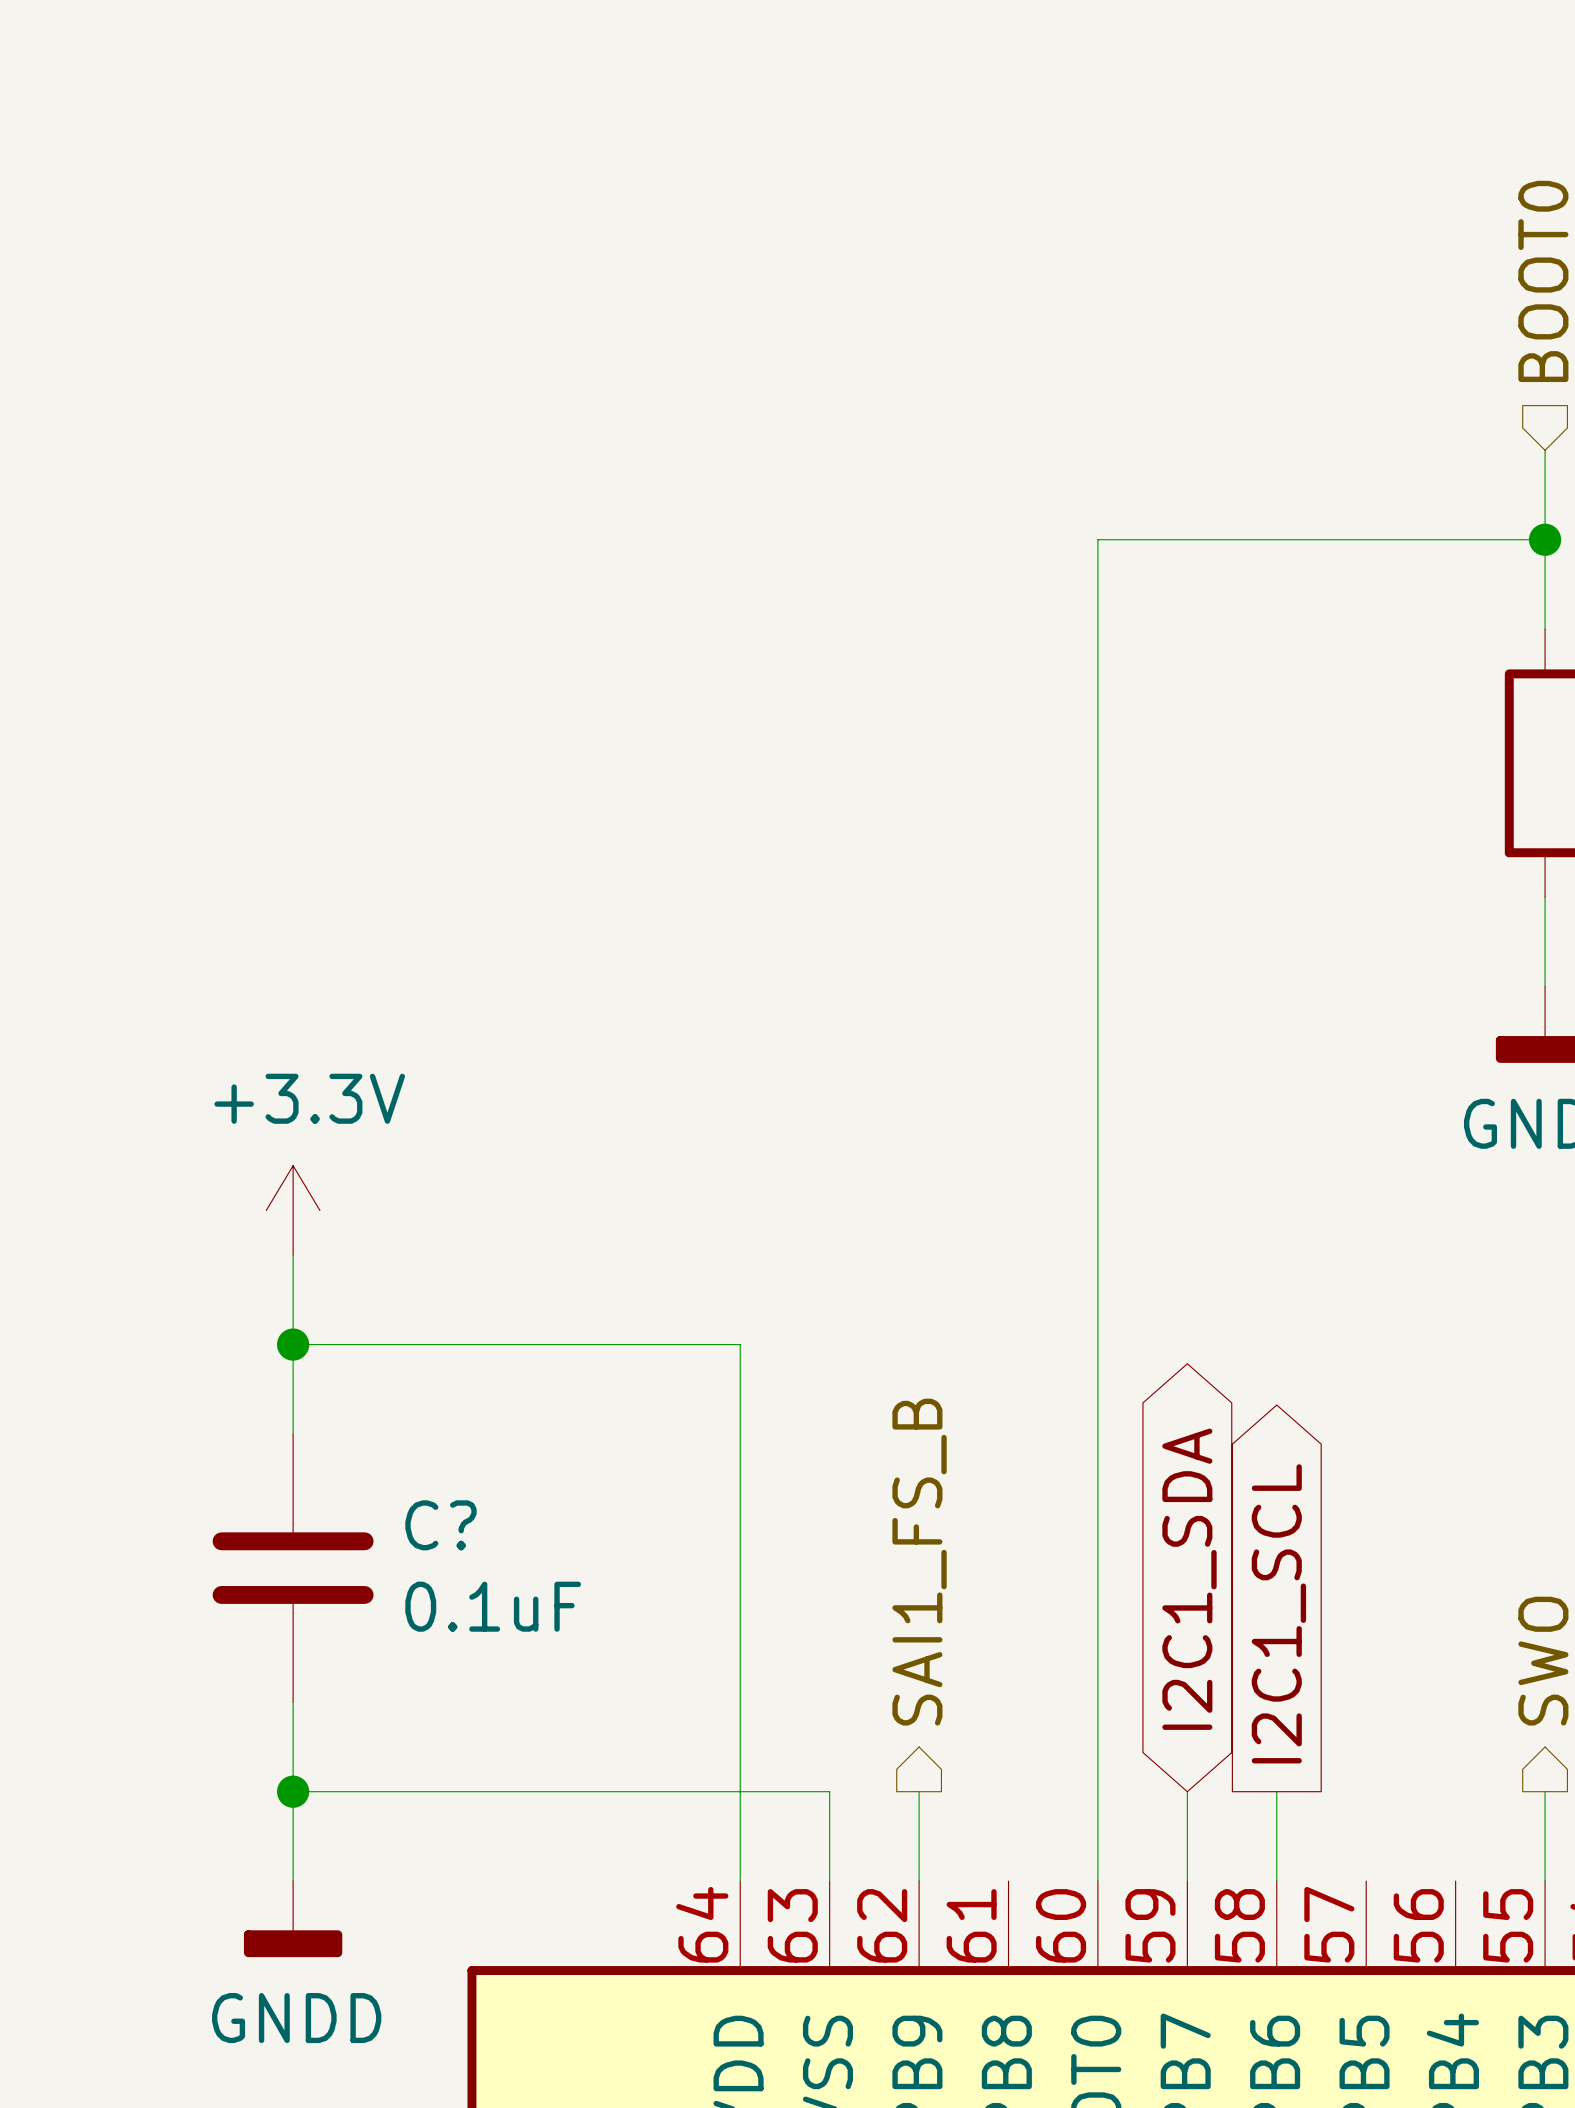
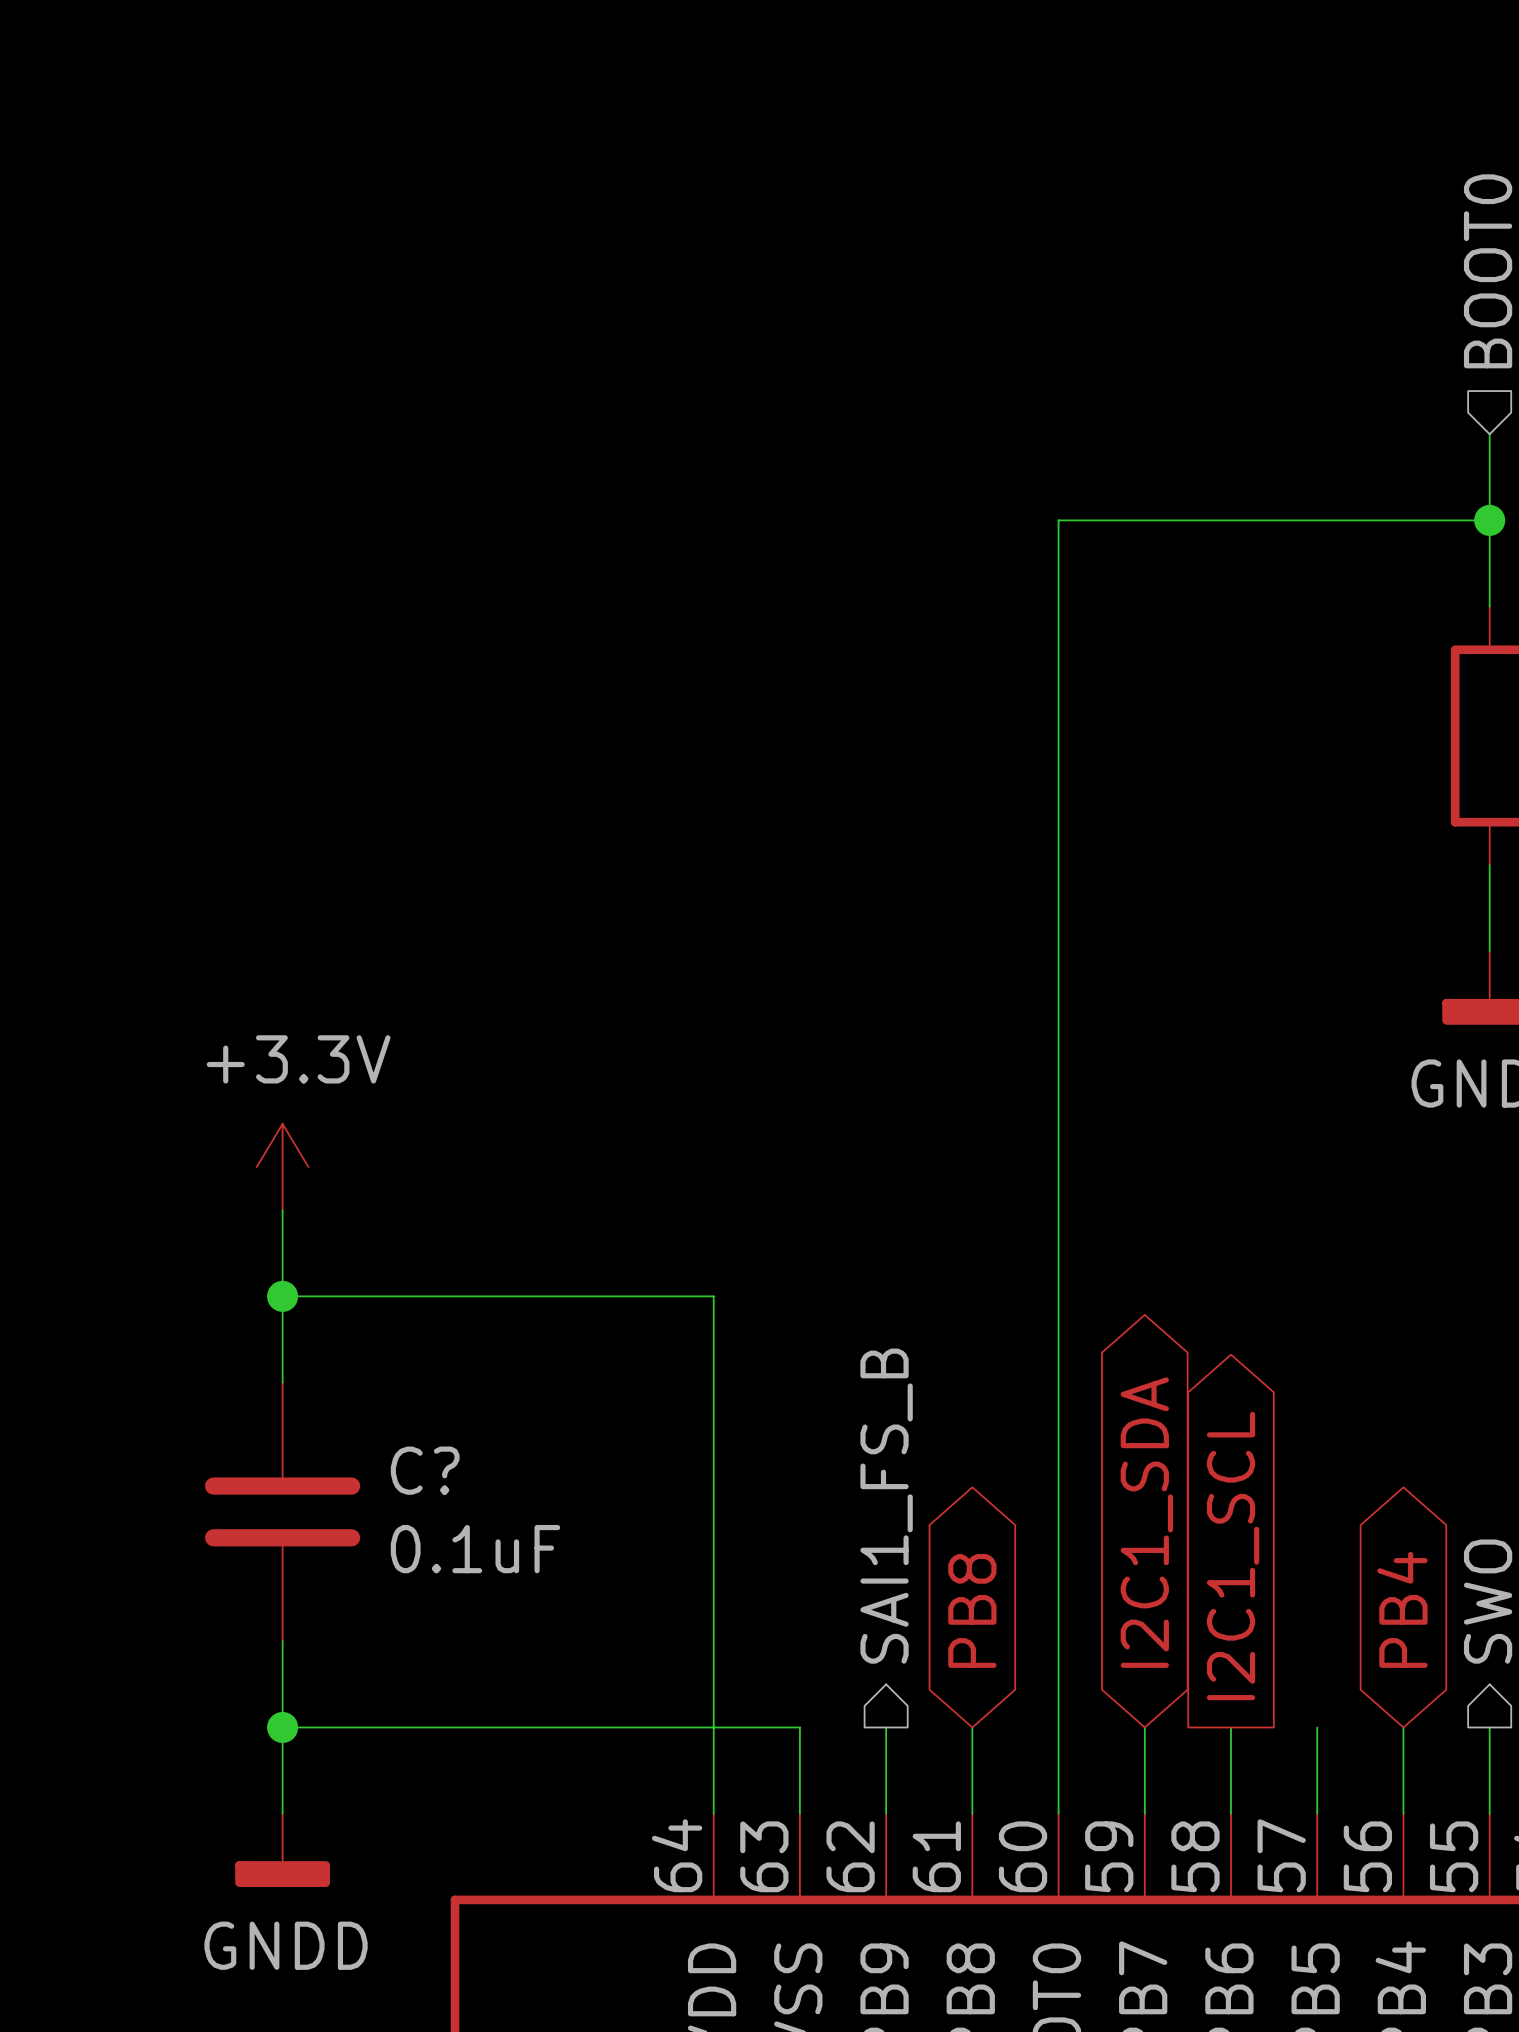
global label: none -> PB4 (1402, 1609)
global label: none -> PB8 (972, 1610)
wire: none -> (972, 1727) (972, 1813)
wire: none -> (1317, 1727) (1317, 1813)
wire: none -> (1403, 1727) (1403, 1813)

